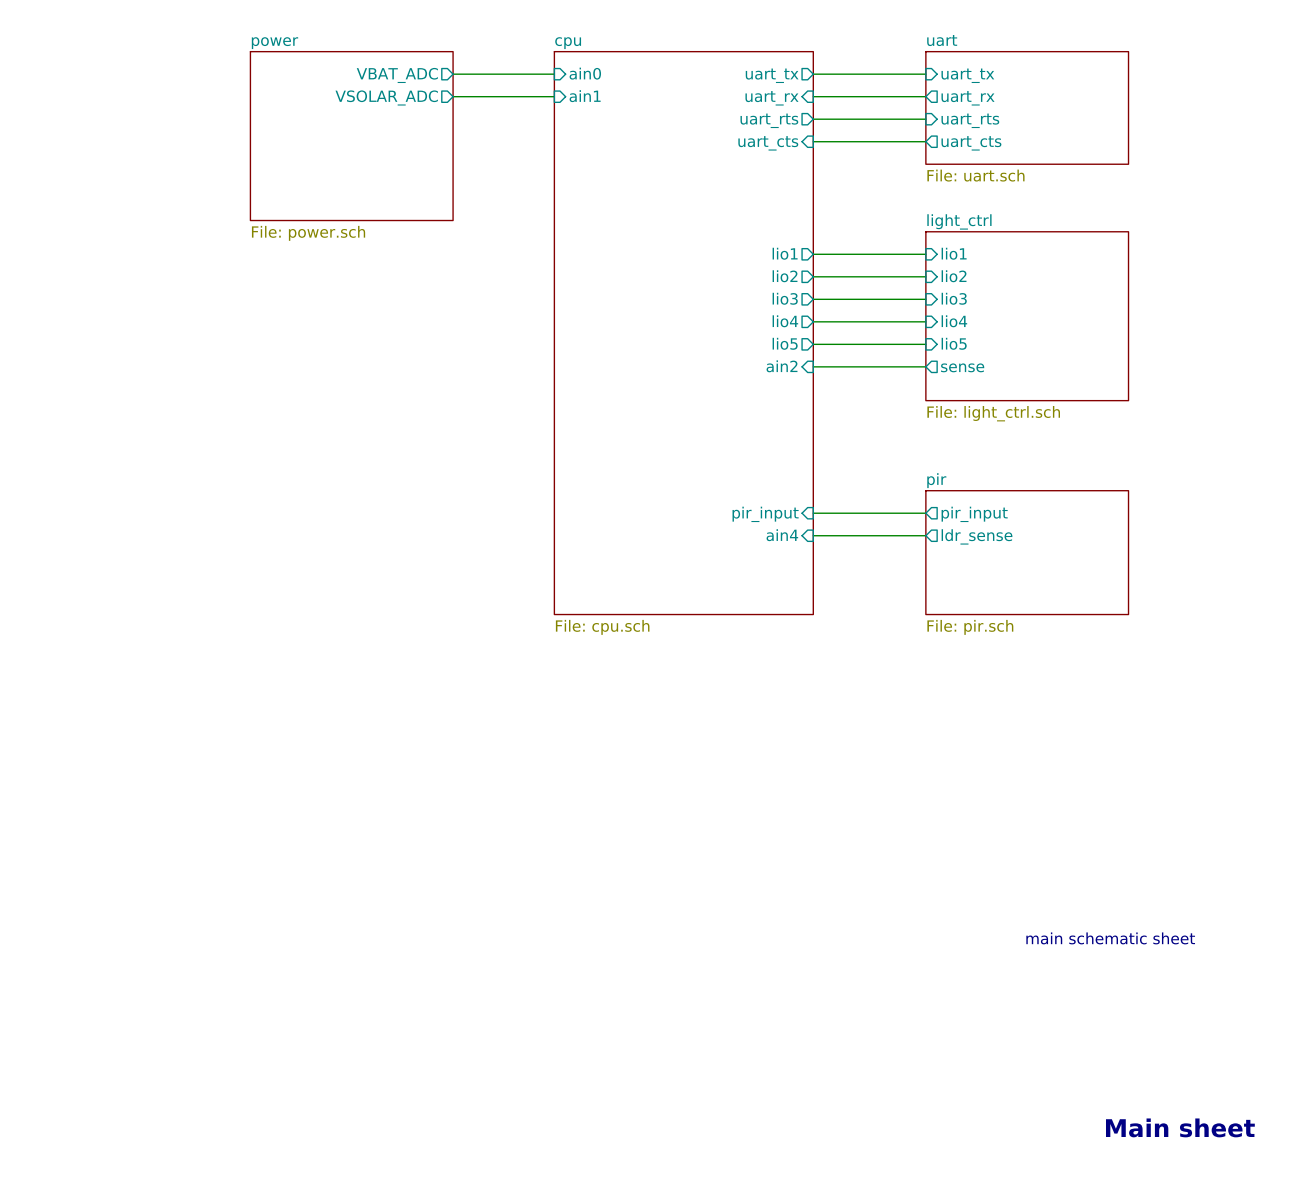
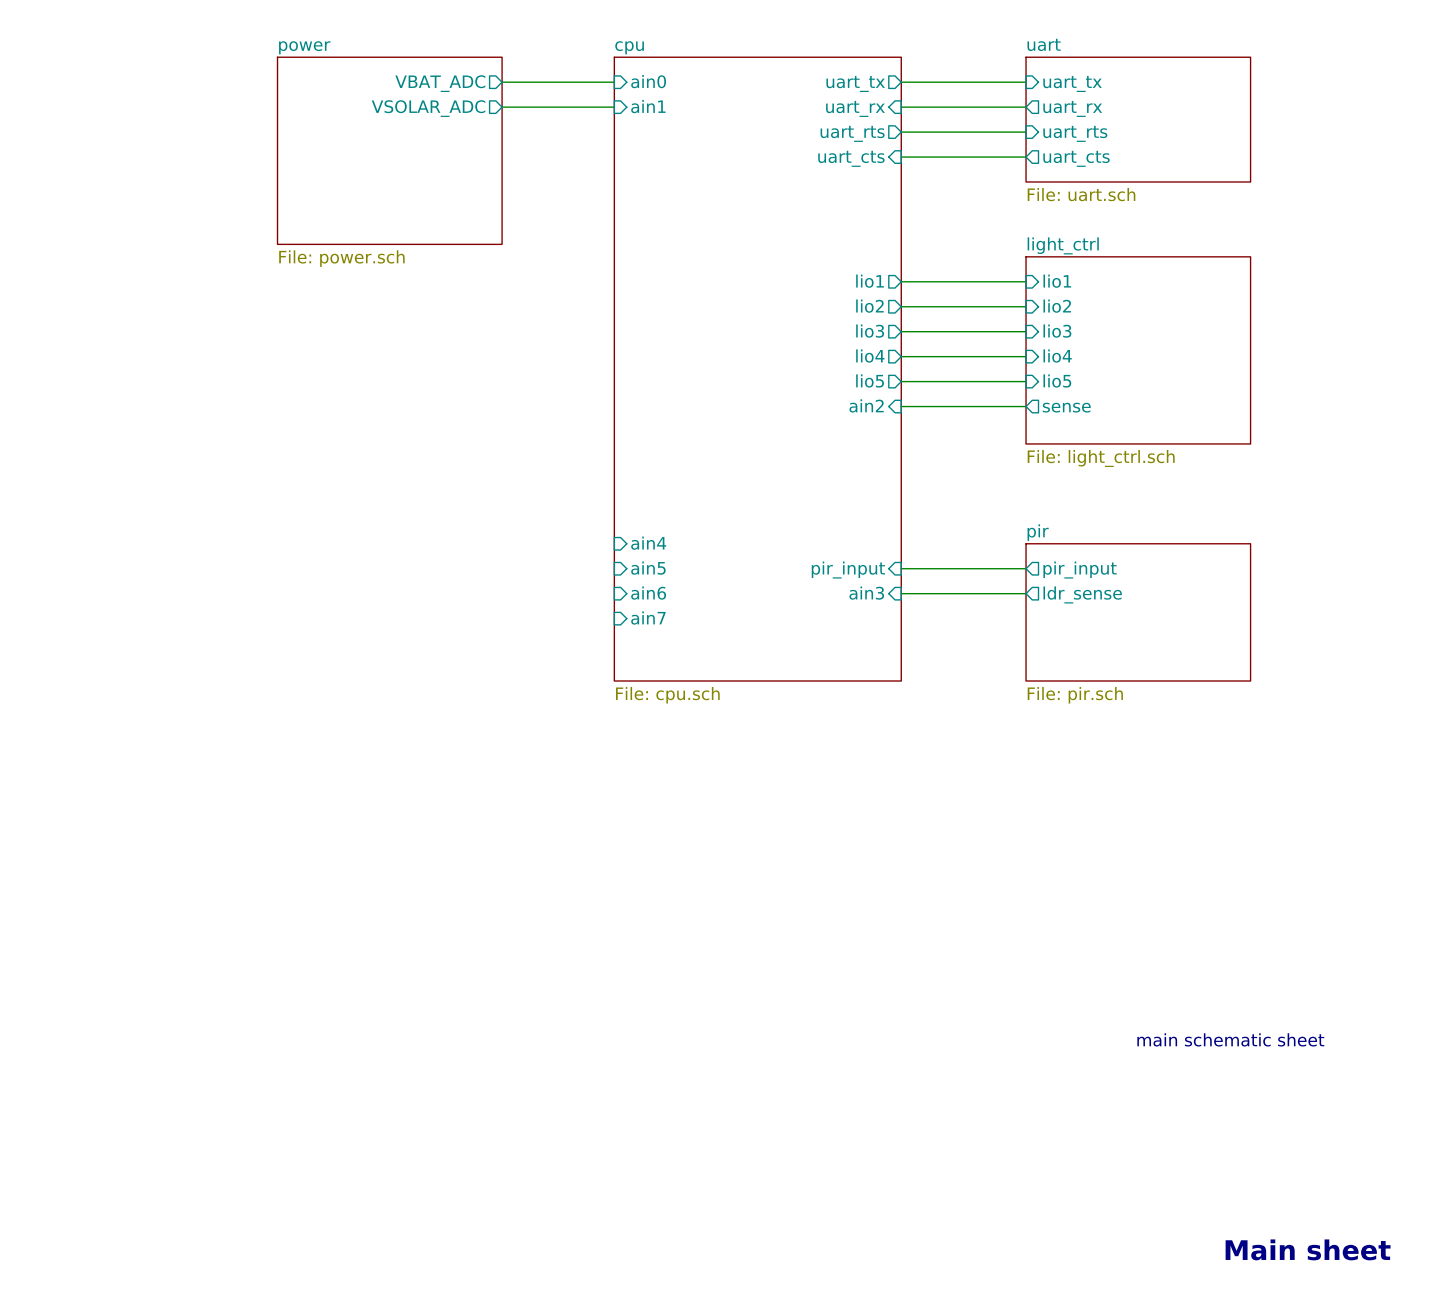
sheet pin: none -> ain4 (648, 543)
sheet pin: none -> ain5 (648, 568)
sheet pin: none -> ain6 (648, 593)
sheet pin: ain4 (782, 535) -> ain3 (866, 593)
sheet pin: none -> ain7 (648, 618)

